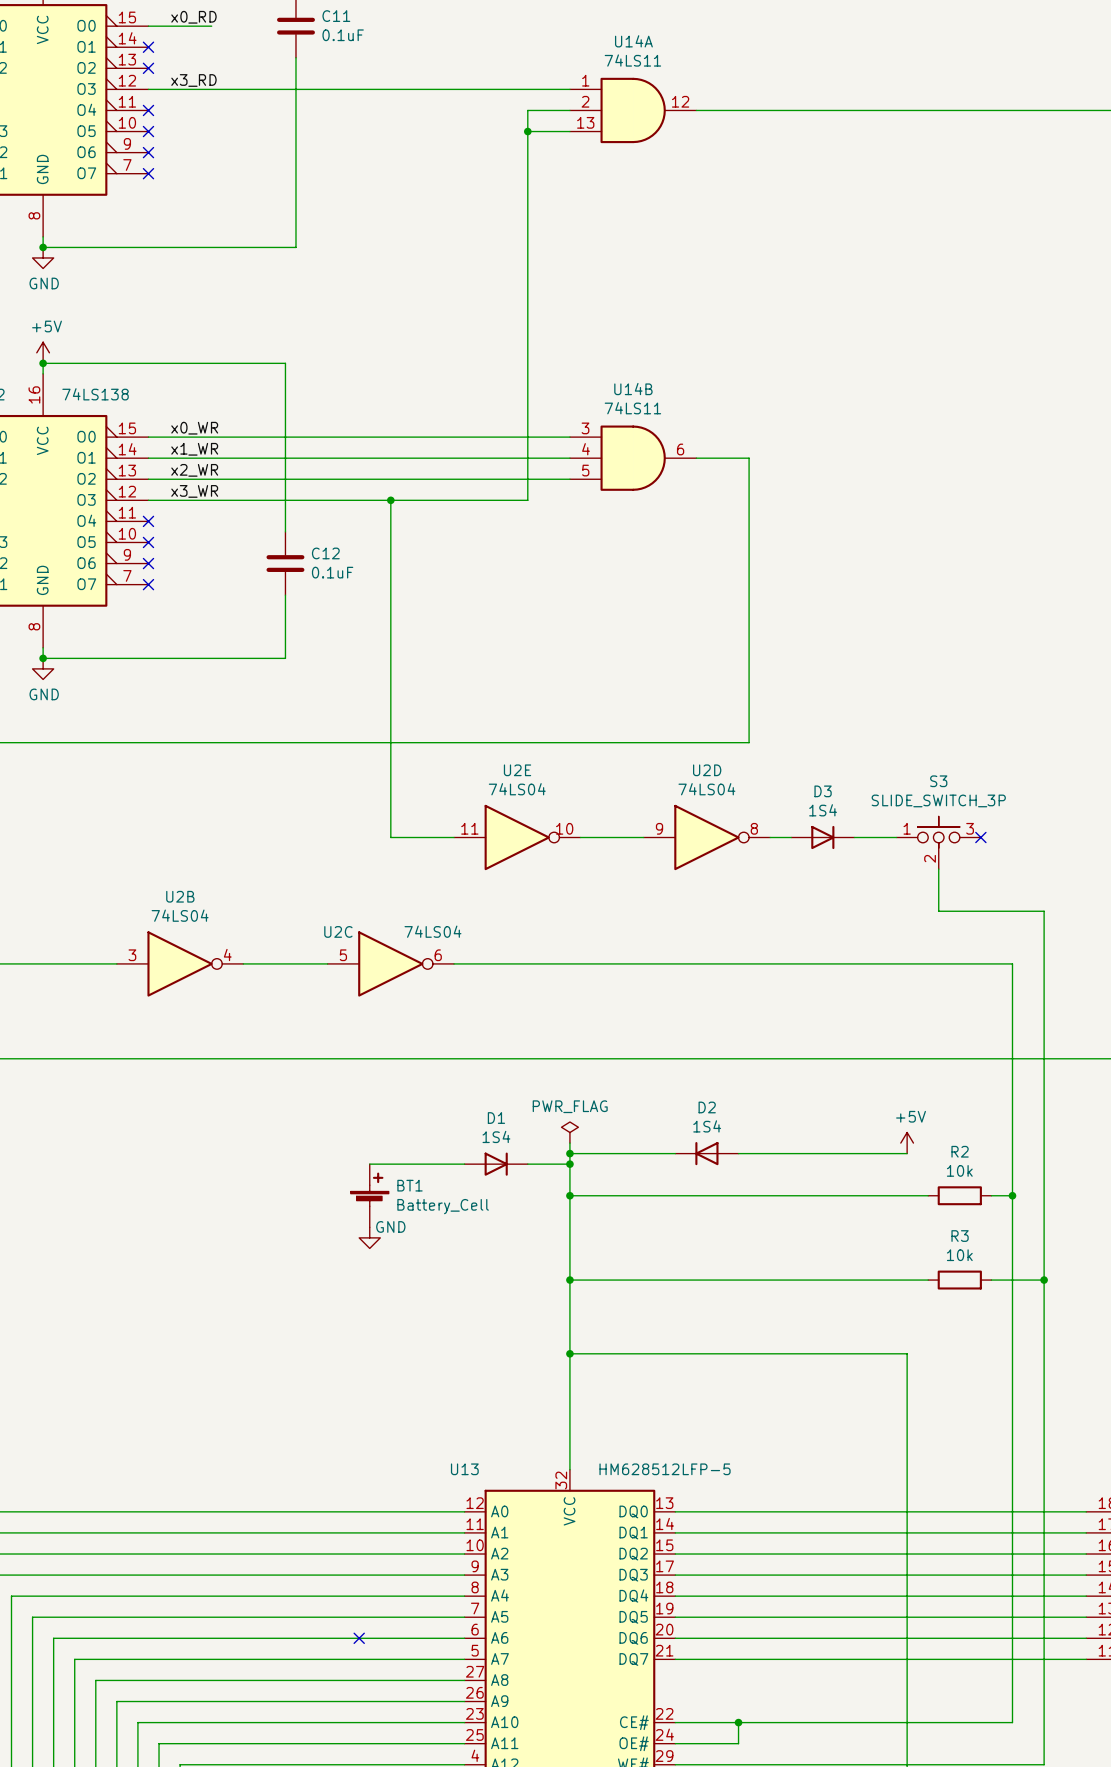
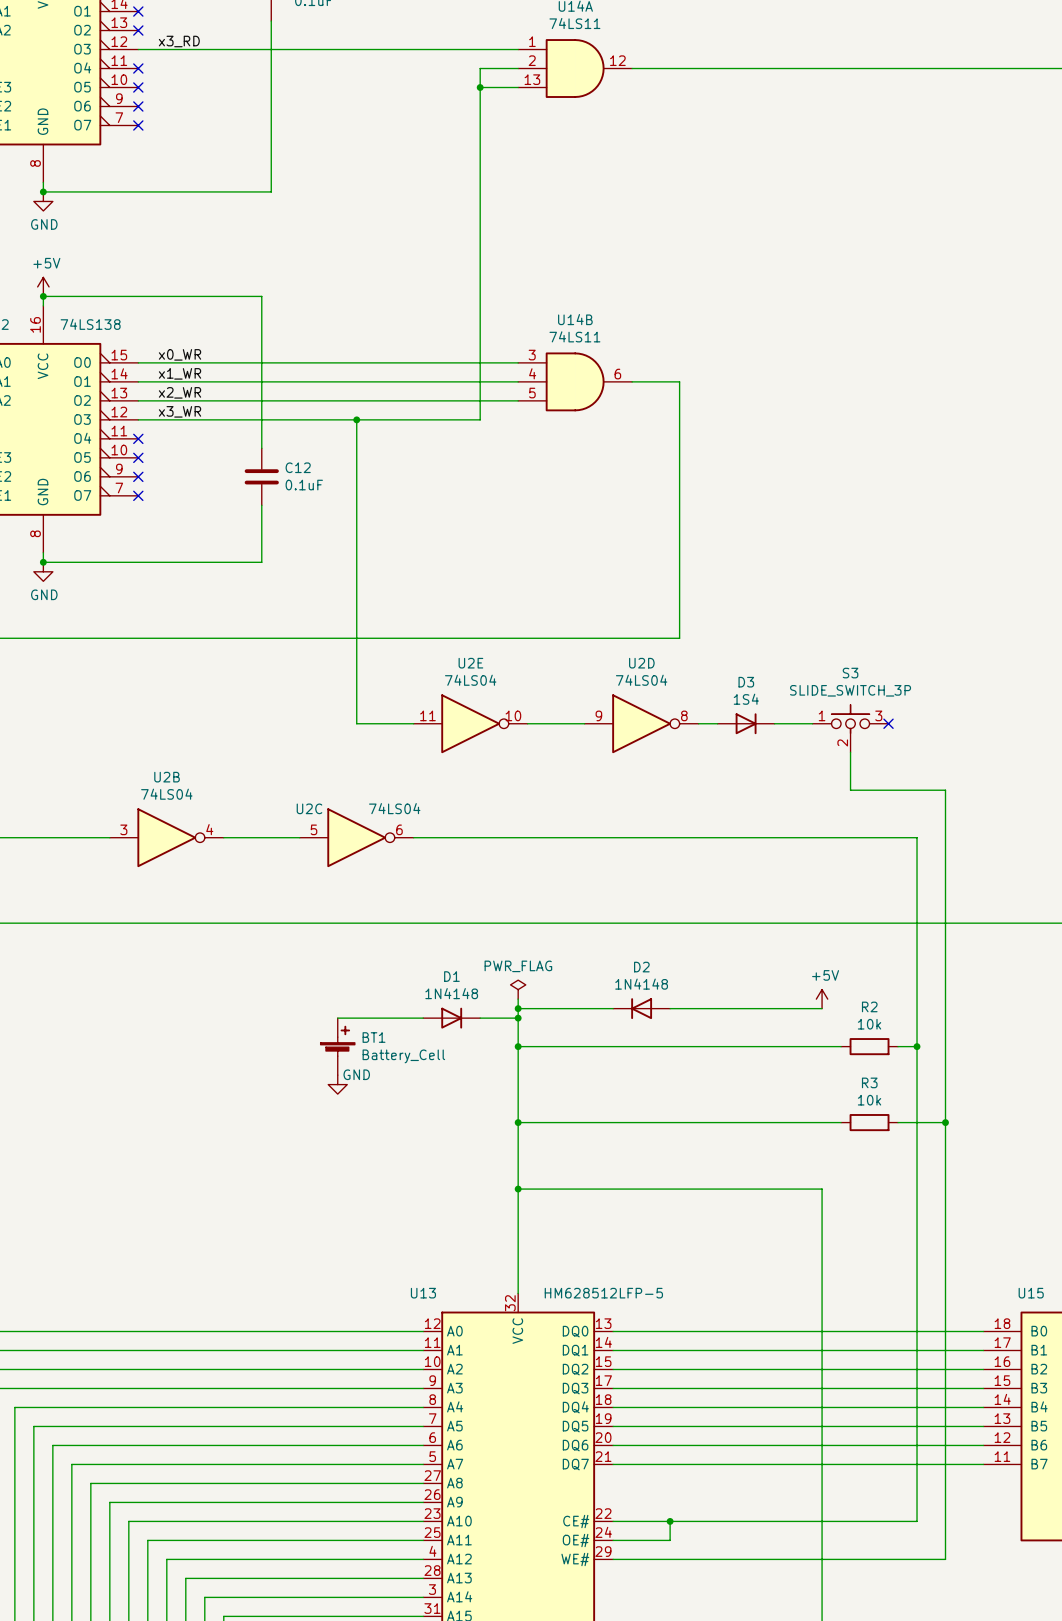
D2 value: 1S4 (707, 1126) -> 1N4148 (641, 984)
D1 value: 1S4 (496, 1136) -> 1N4148 (451, 993)
no-connect mark: (359, 1638) -> none

